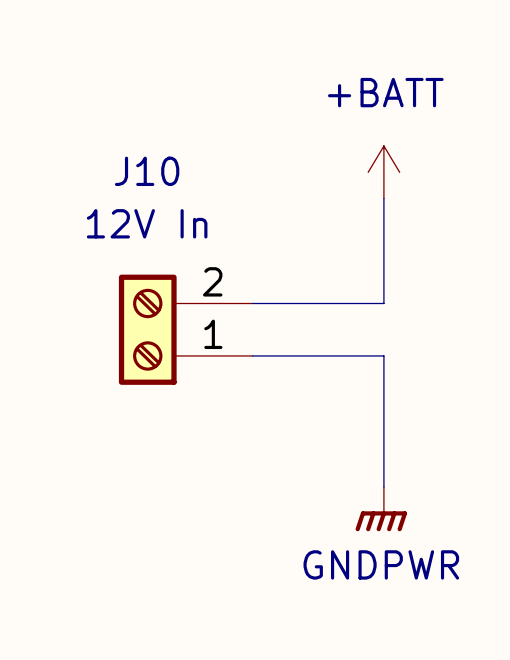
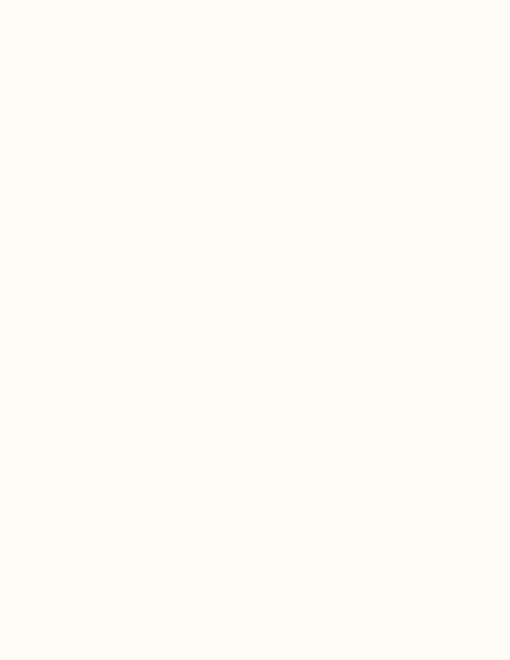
power symbol: +BATT (383, 172) -> none
wire: (383, 198) (383, 303) (252, 303) -> none
J10: 12V In (185, 329) -> none
wire: (252, 355) (383, 355) (383, 487) -> none
power symbol: GNDPWR (381, 509) -> none

